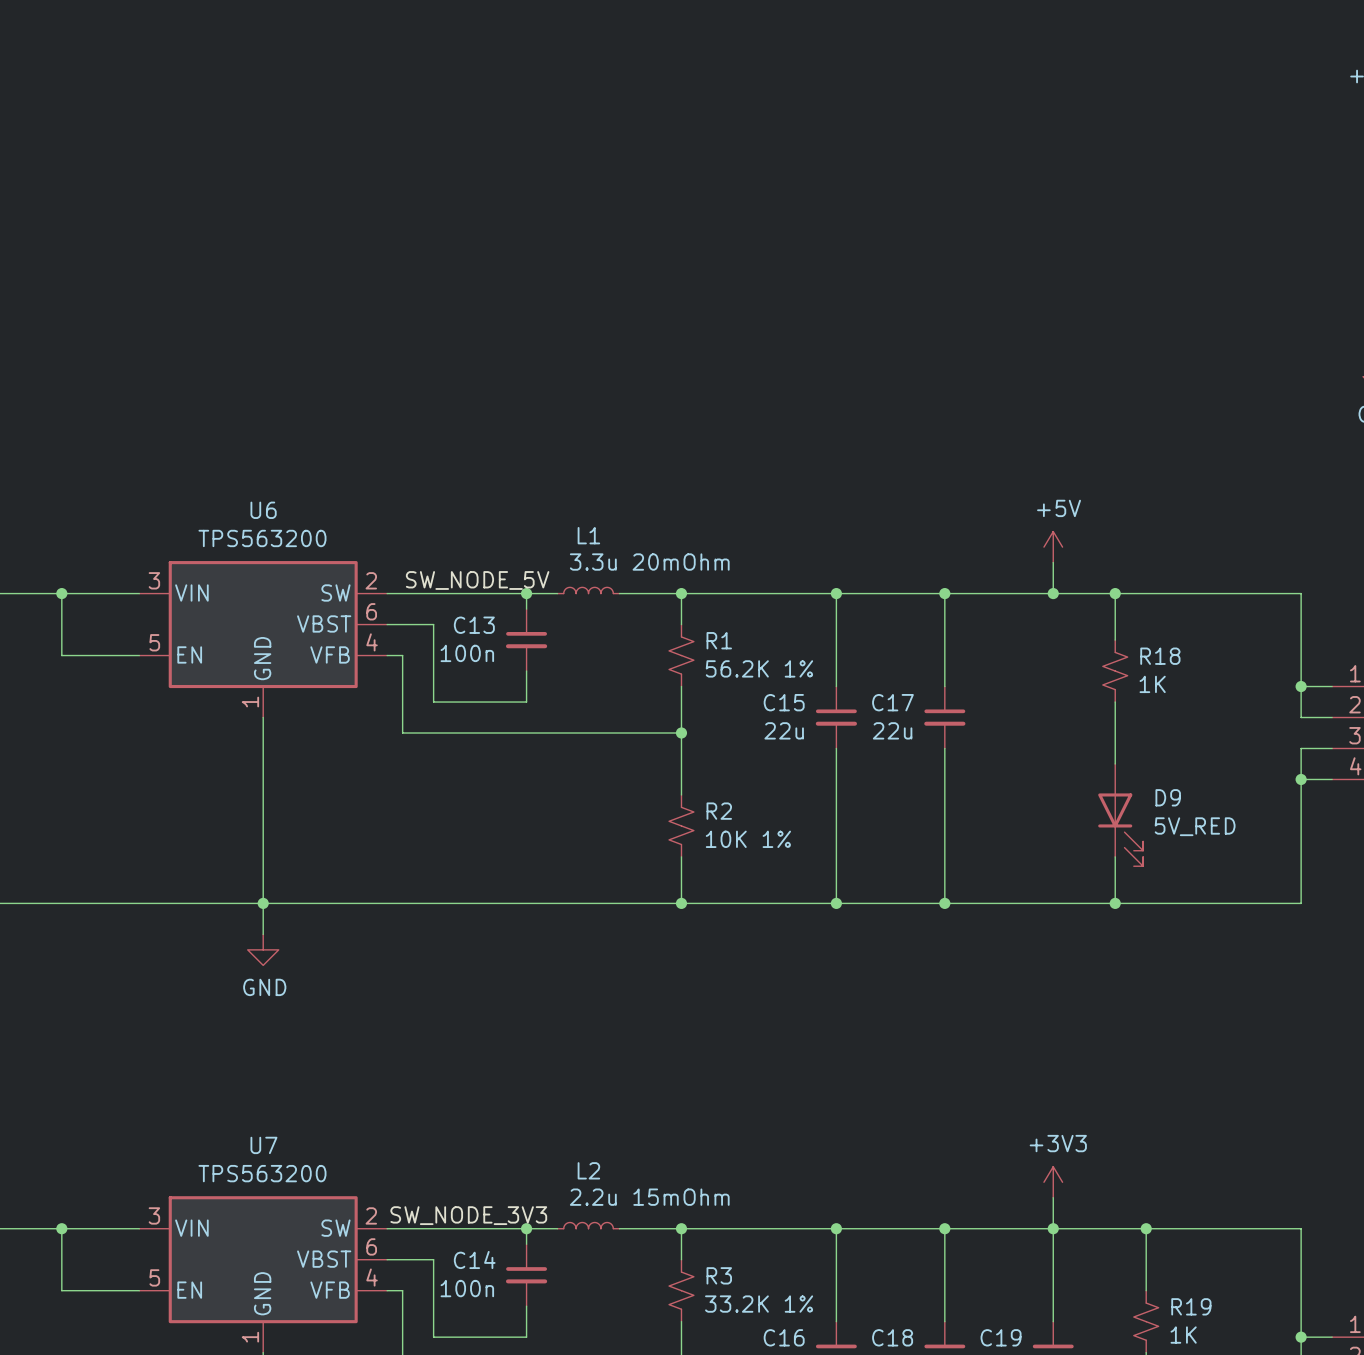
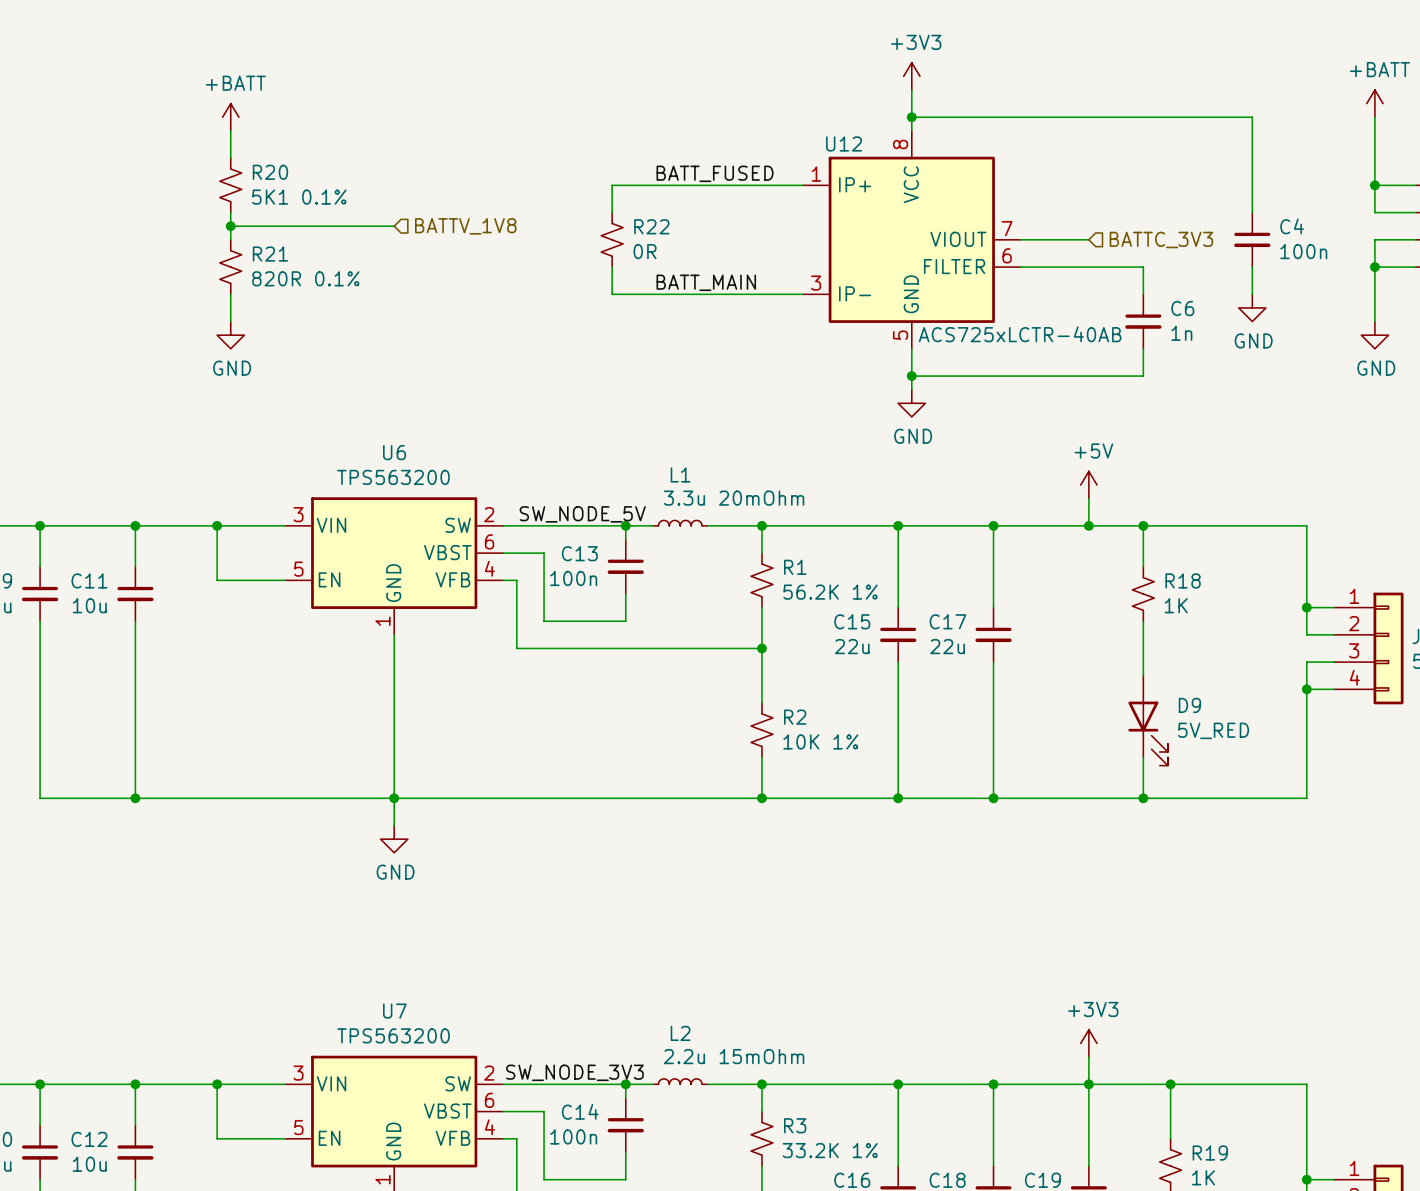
power symbol: none -> +3V3 (911, 76)
wire: none -> (911, 90) (911, 130)
power symbol: none -> +BATT (230, 117)
wire: none -> (911, 117) (1252, 117) (1252, 212)
junction: none -> (911, 117)
wire: none -> (230, 130) (230, 158)
label: none -> BATT_FUSED (715, 173)
R20: none -> 5K1 0.1% (230, 185)
wire: none -> (802, 185) (612, 185) (612, 212)
wire: none -> (230, 212) (230, 239)
wire: none -> (230, 226) (394, 226)
junction: none -> (230, 226)
hierarchical label: none -> BATTV_1V8 (465, 226)
R22: none -> 0R (612, 239)
U12: none -> ACS725xLCTR-40AB (911, 239)
wire: none -> (1020, 239) (1088, 239)
hierarchical label: none -> BATTC_3V3 (1161, 239)
C4: none -> 100n (1252, 239)
R21: none -> 820R 0.1% (230, 267)
wire: none -> (612, 267) (612, 294) (802, 294)
wire: none -> (1020, 267) (1143, 267) (1143, 294)
wire: none -> (1252, 267) (1252, 294)
label: none -> BATT_MAIN (706, 282)
wire: none -> (230, 294) (230, 321)
power symbol: none -> GND (1252, 307)
C6: none -> 1n (1143, 321)
power symbol: none -> GND (230, 335)
wire: none -> (911, 348) (911, 389)
wire: none -> (1143, 348) (1143, 376) (911, 376)
junction: none -> (911, 376)
power symbol: none -> GND (911, 403)

